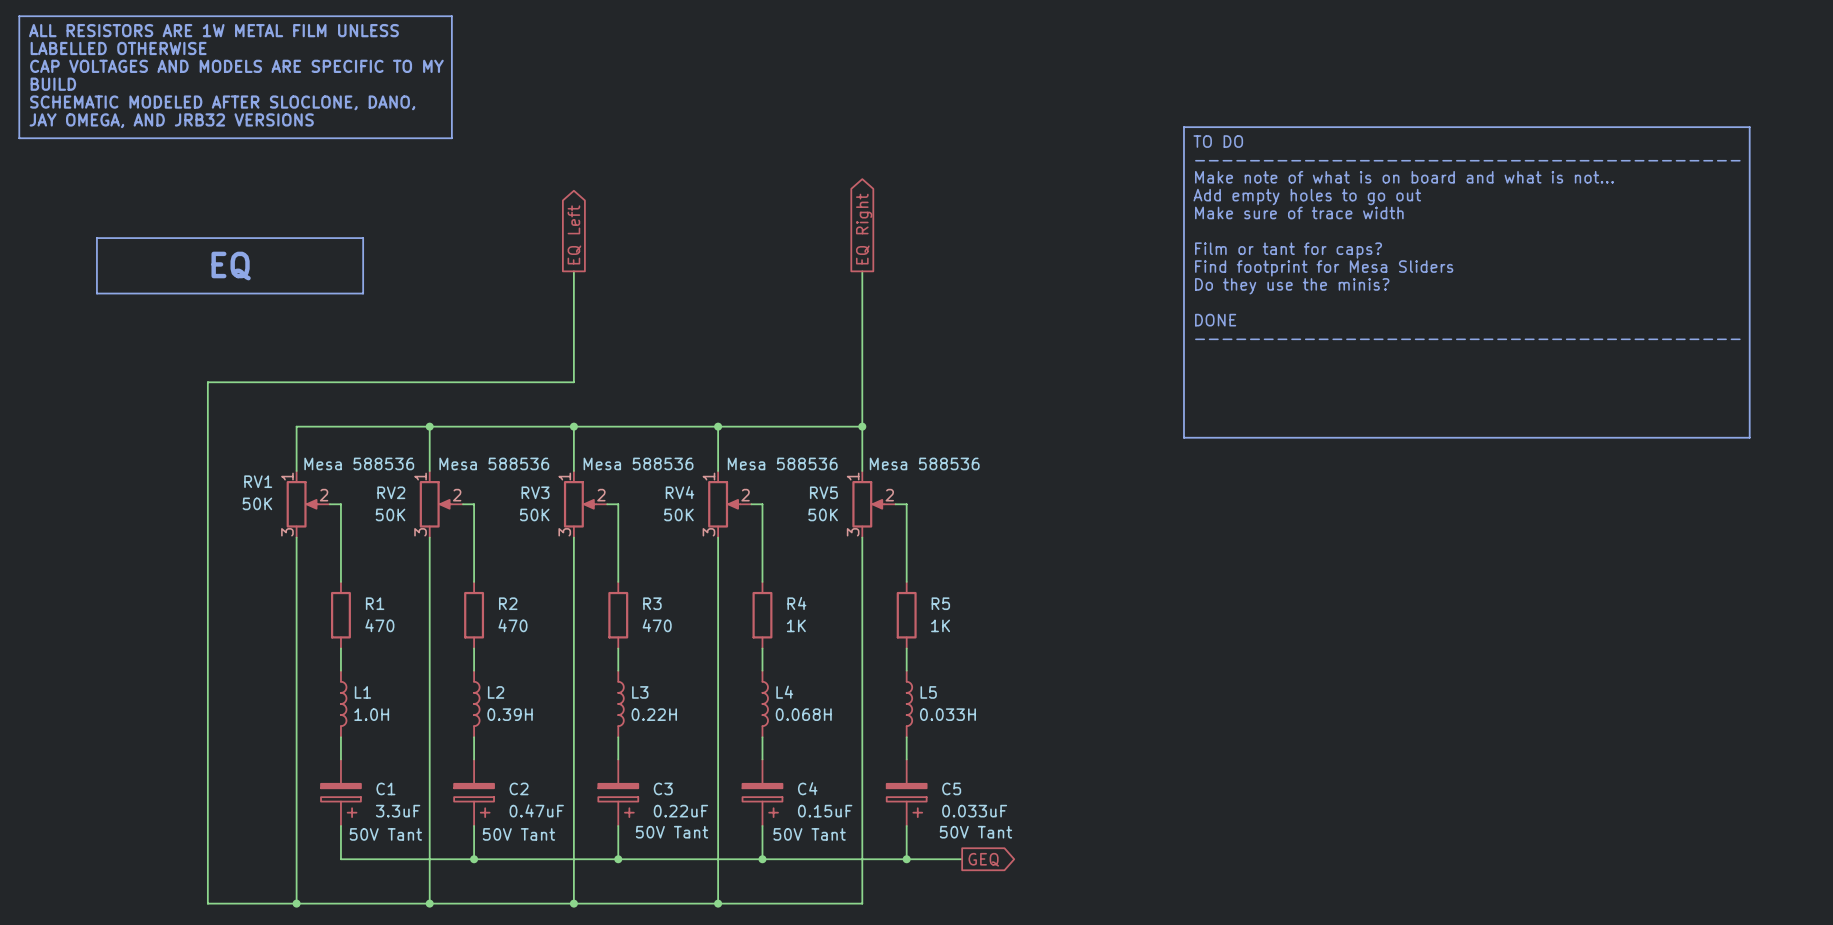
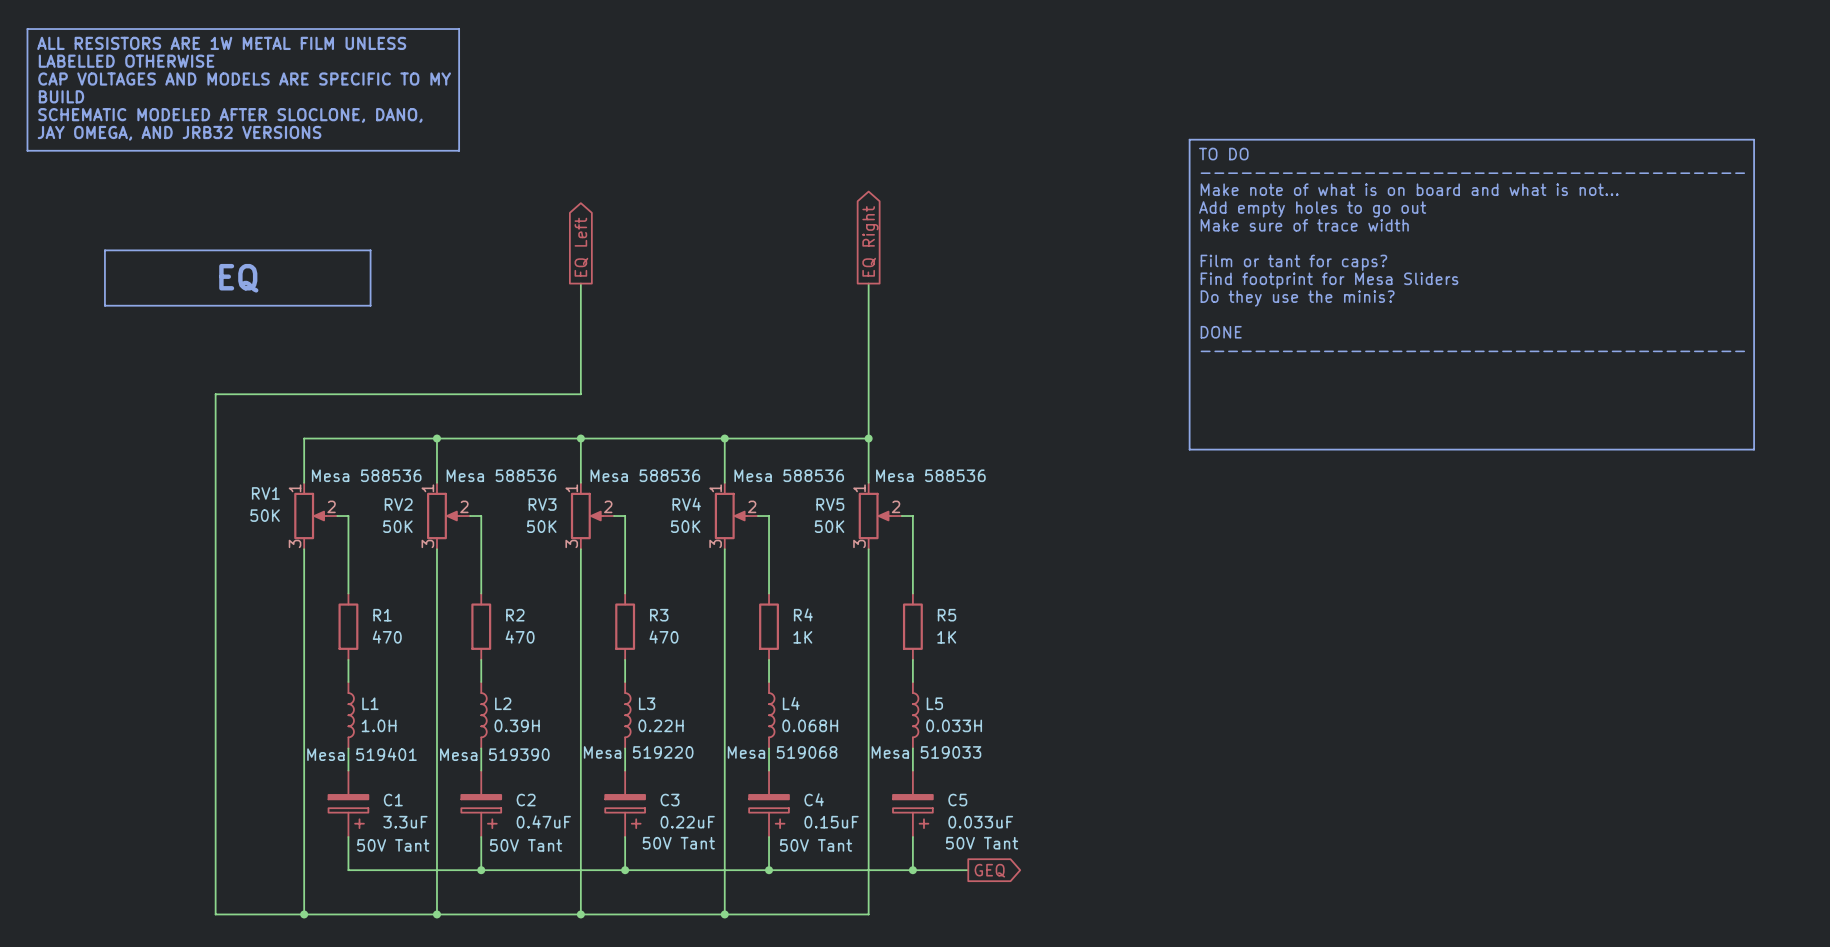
L3 text: none -> Mesa 519220 (638, 752)
L4 text: none -> Mesa 519068 (782, 752)
L5 text: none -> Mesa 519033 (926, 752)
L1 text: none -> Mesa 519401 (361, 754)
L2 text: none -> Mesa 519390 (494, 754)

